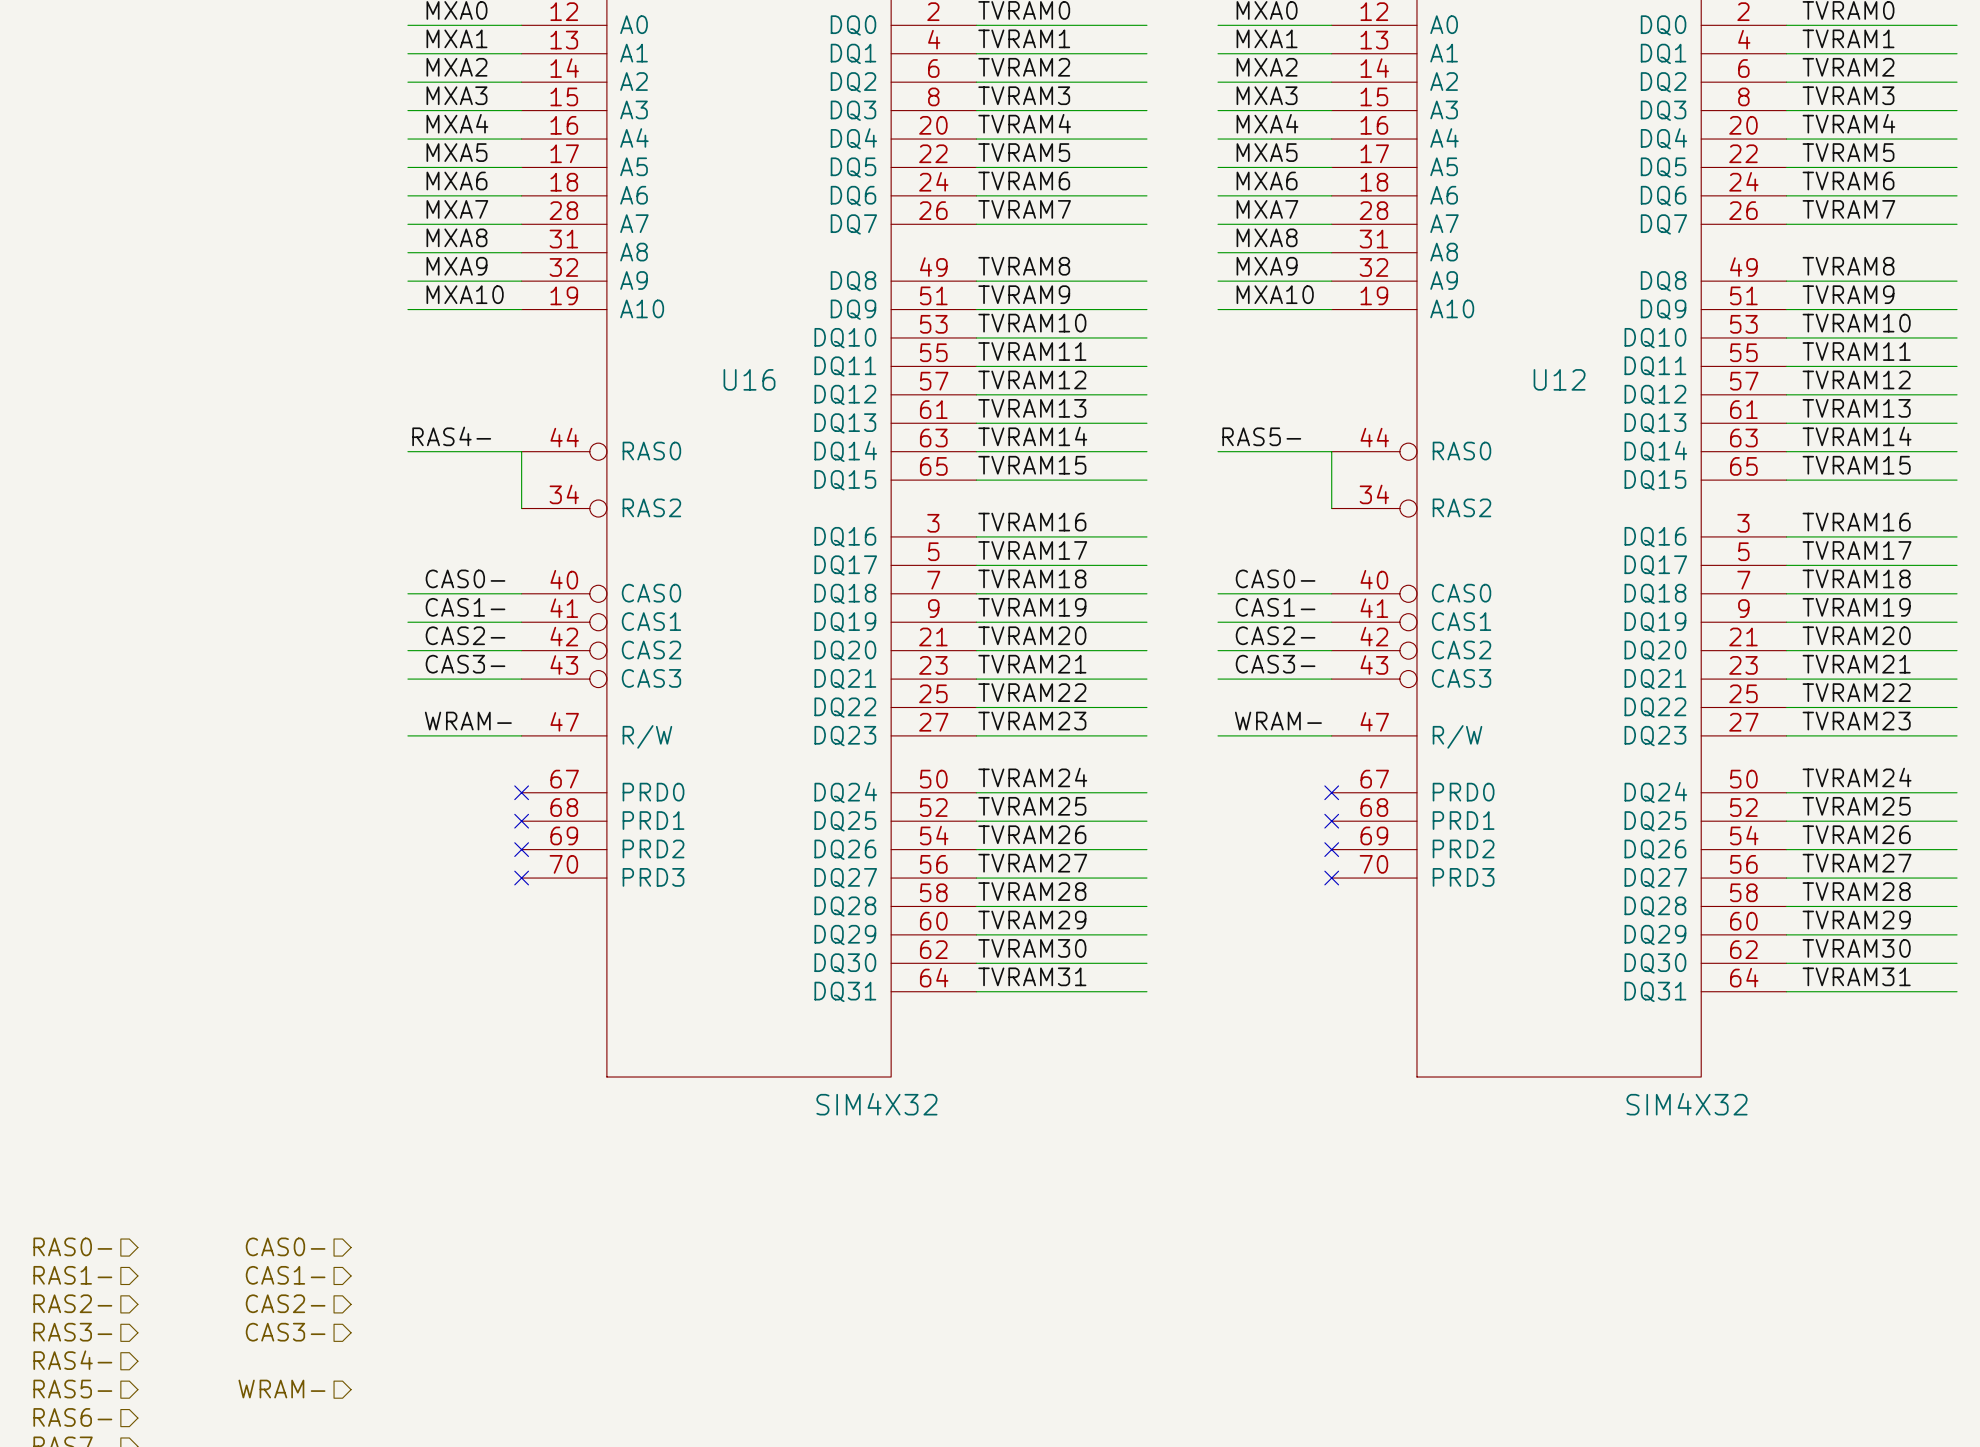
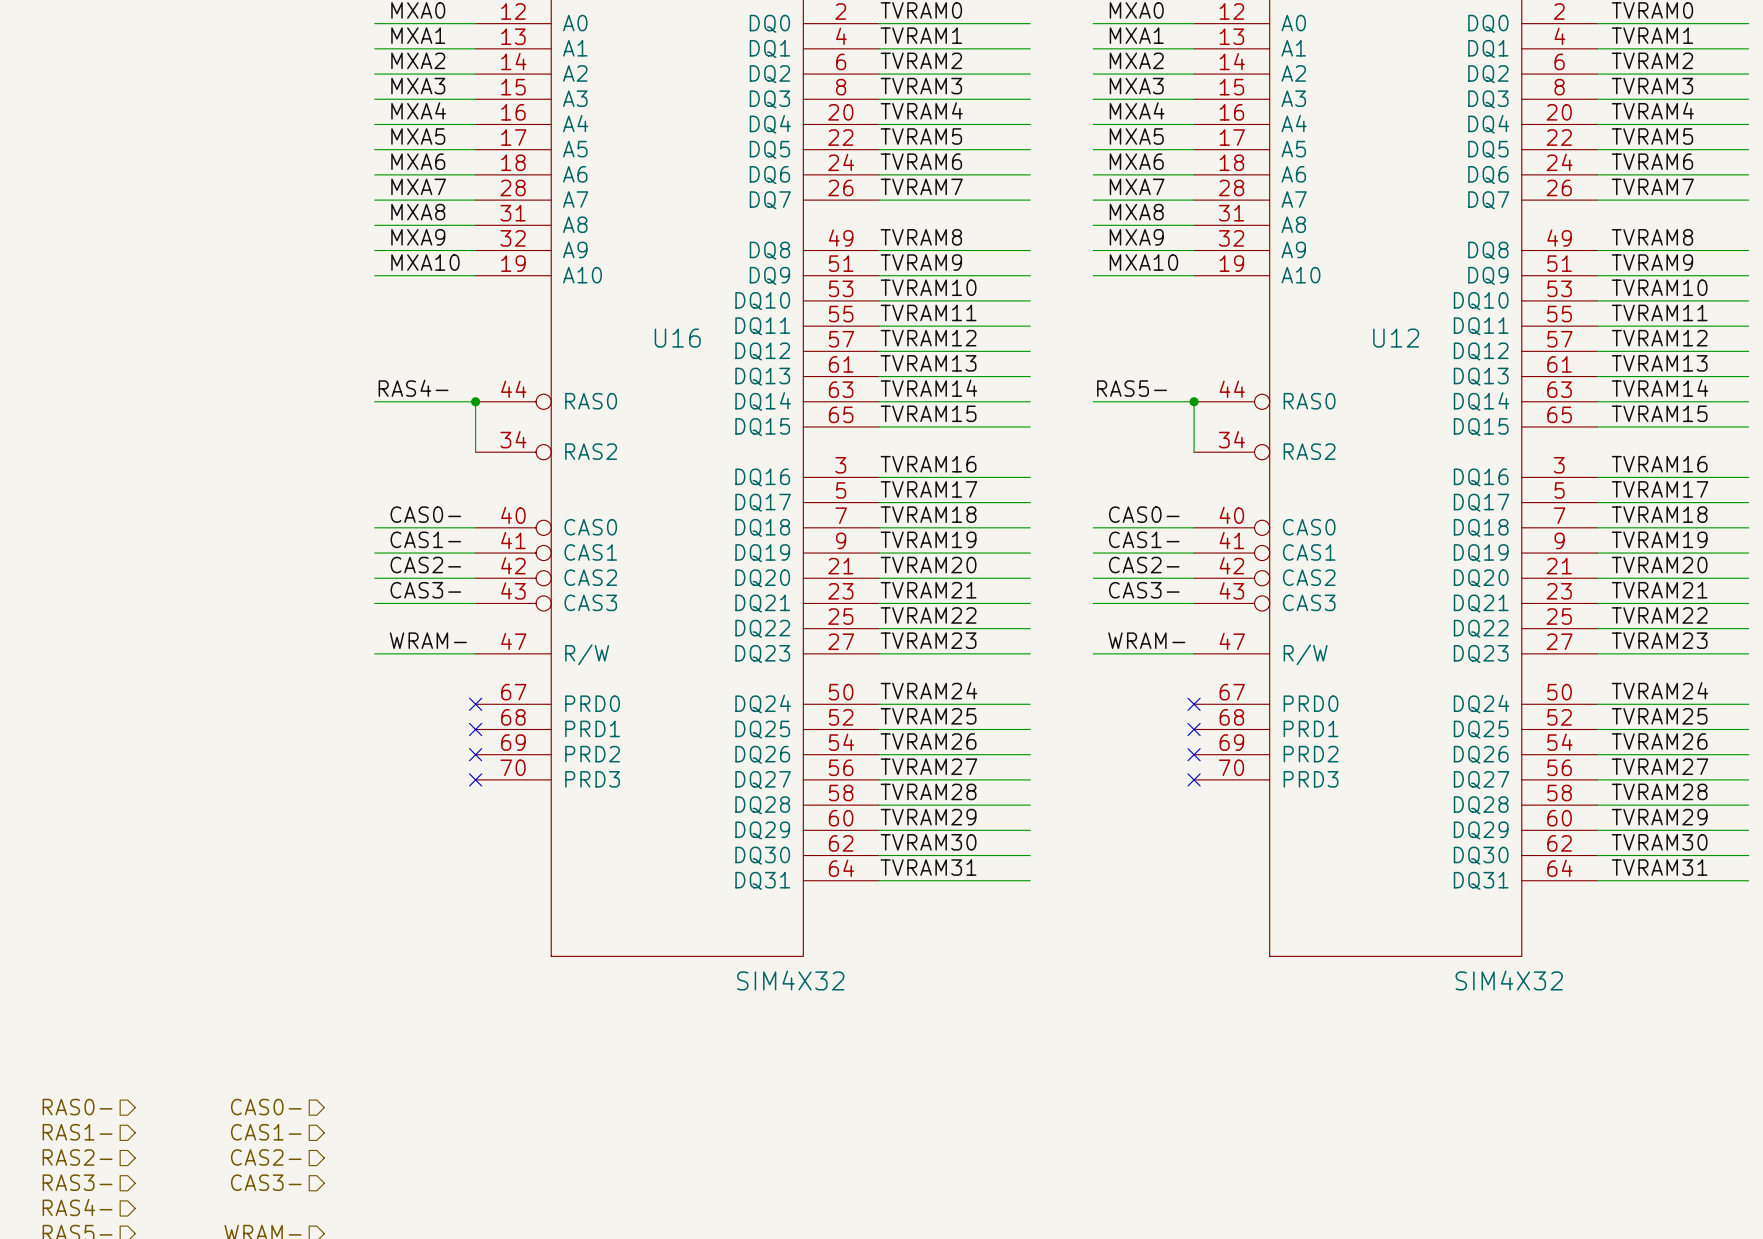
junction: none -> (475, 401)
junction: none -> (1194, 401)

